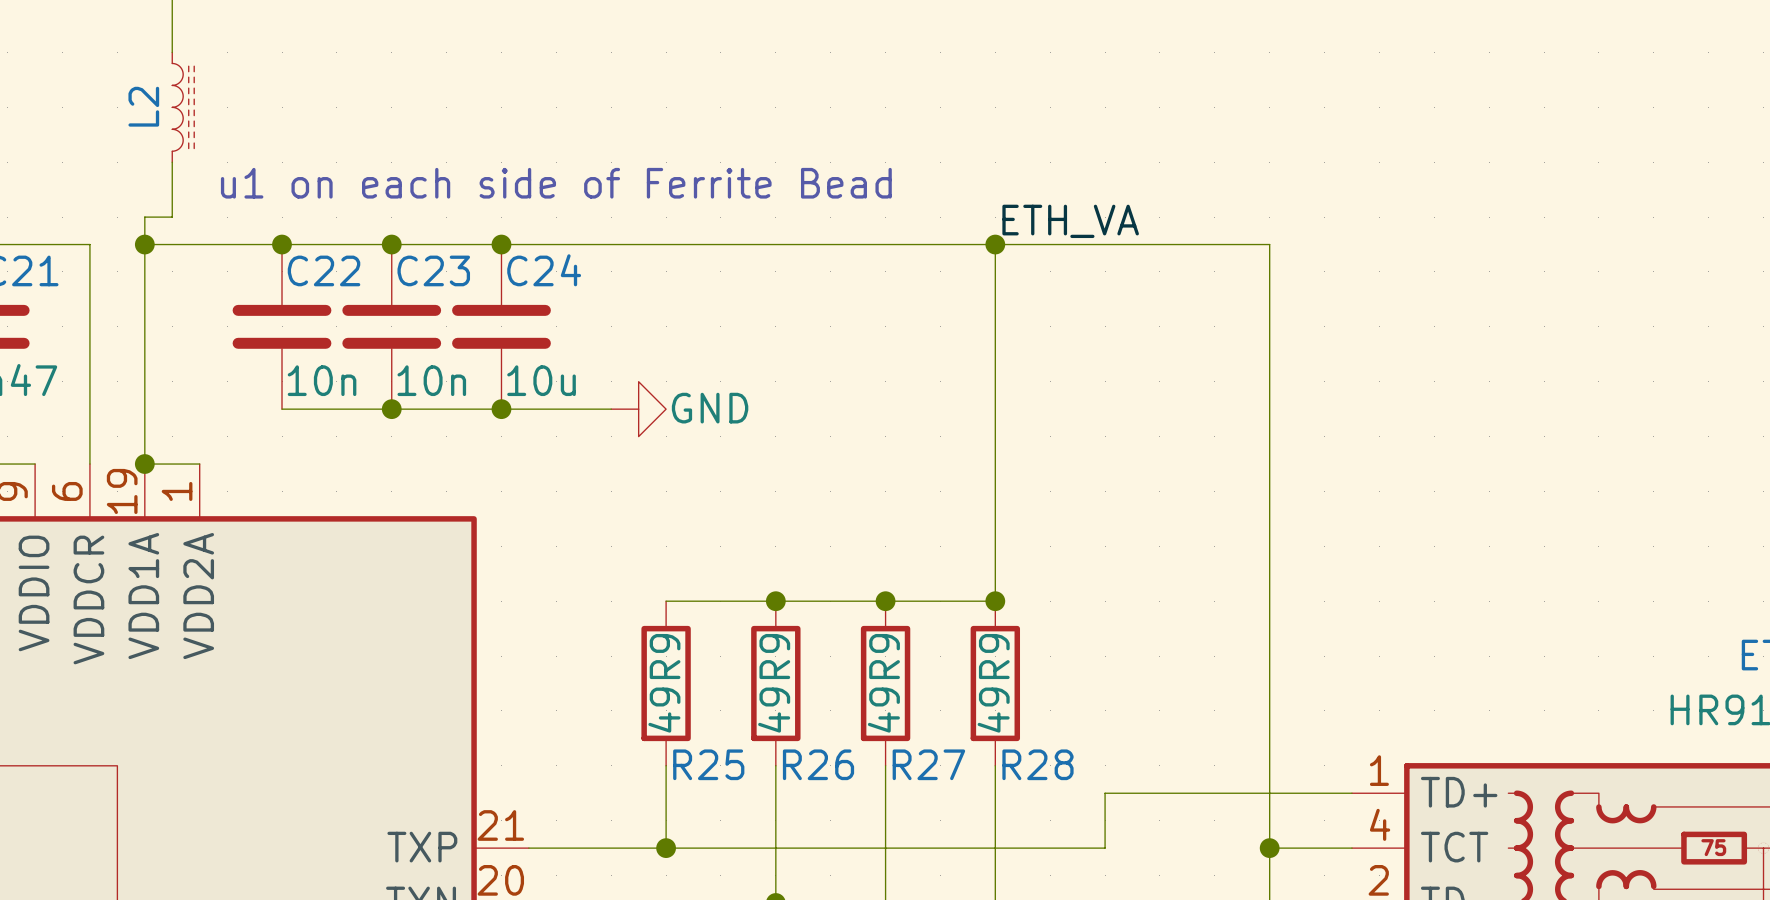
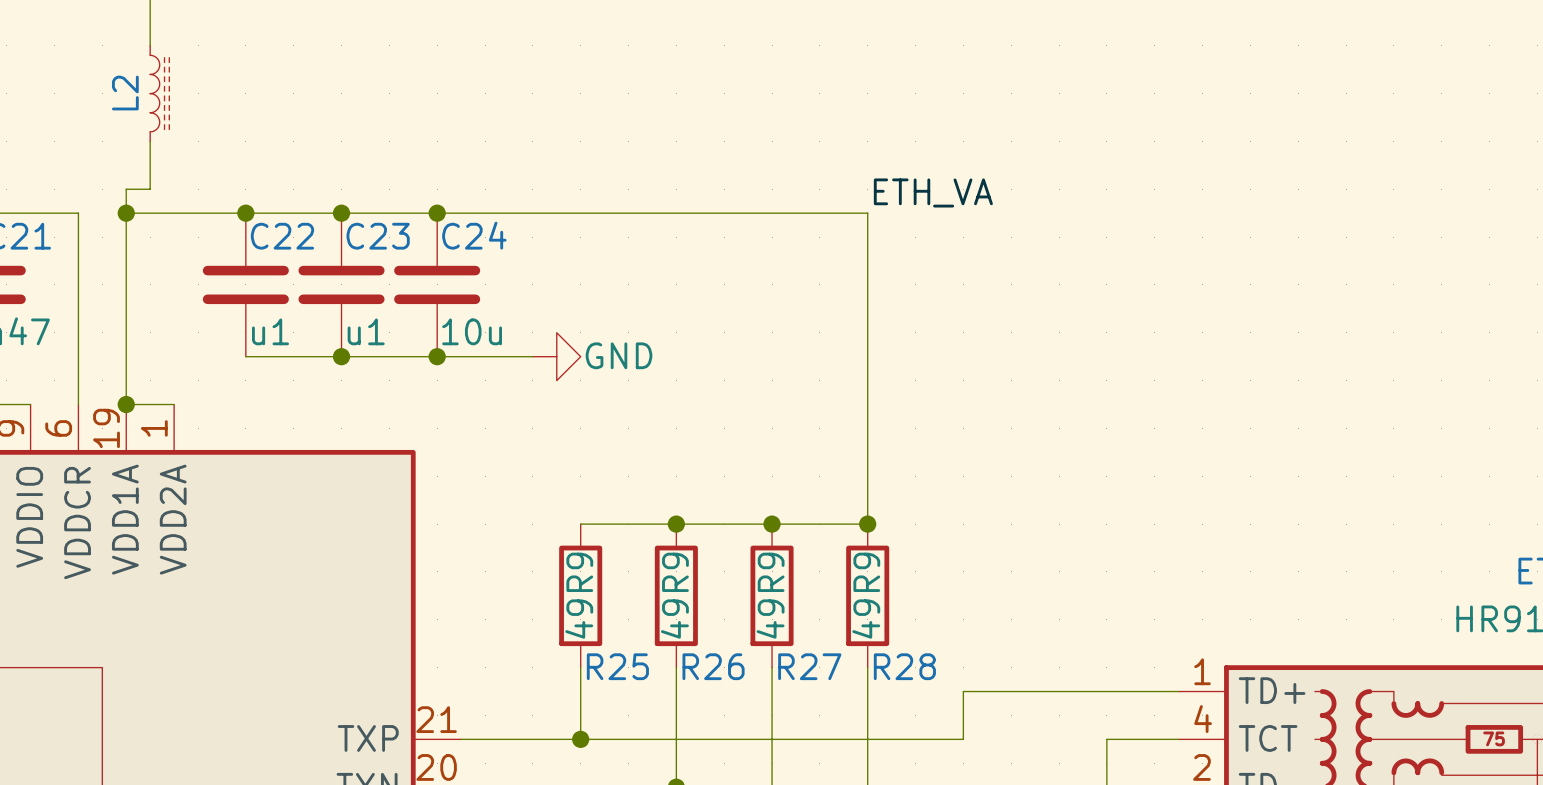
text: u1 on each side of Ferrite Bead (556, 183) -> none
wire: (995, 244) (1269, 244) (1269, 848) -> none
junction: (995, 244) -> none
C22 value: 10n (322, 380) -> u1 (270, 331)
C23 value: 10n (431, 380) -> u1 (366, 331)
junction: (1269, 848) -> none

